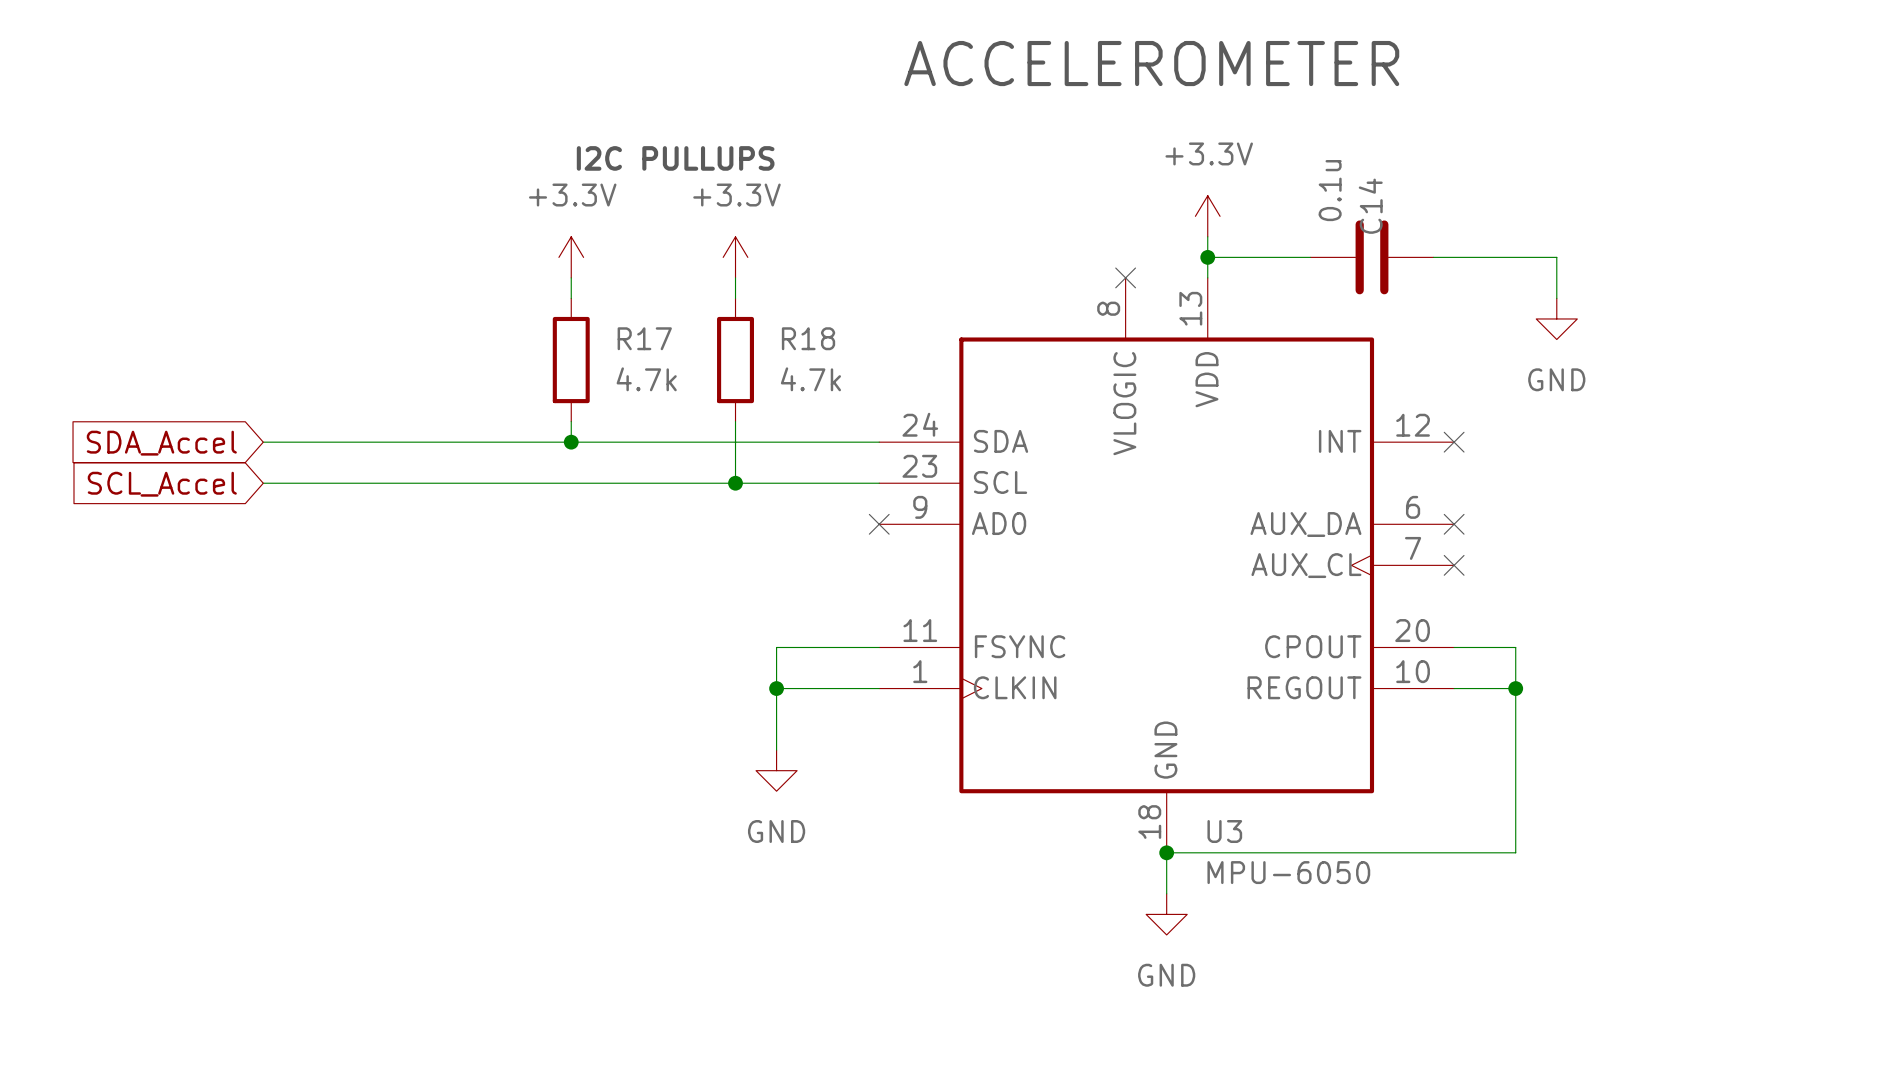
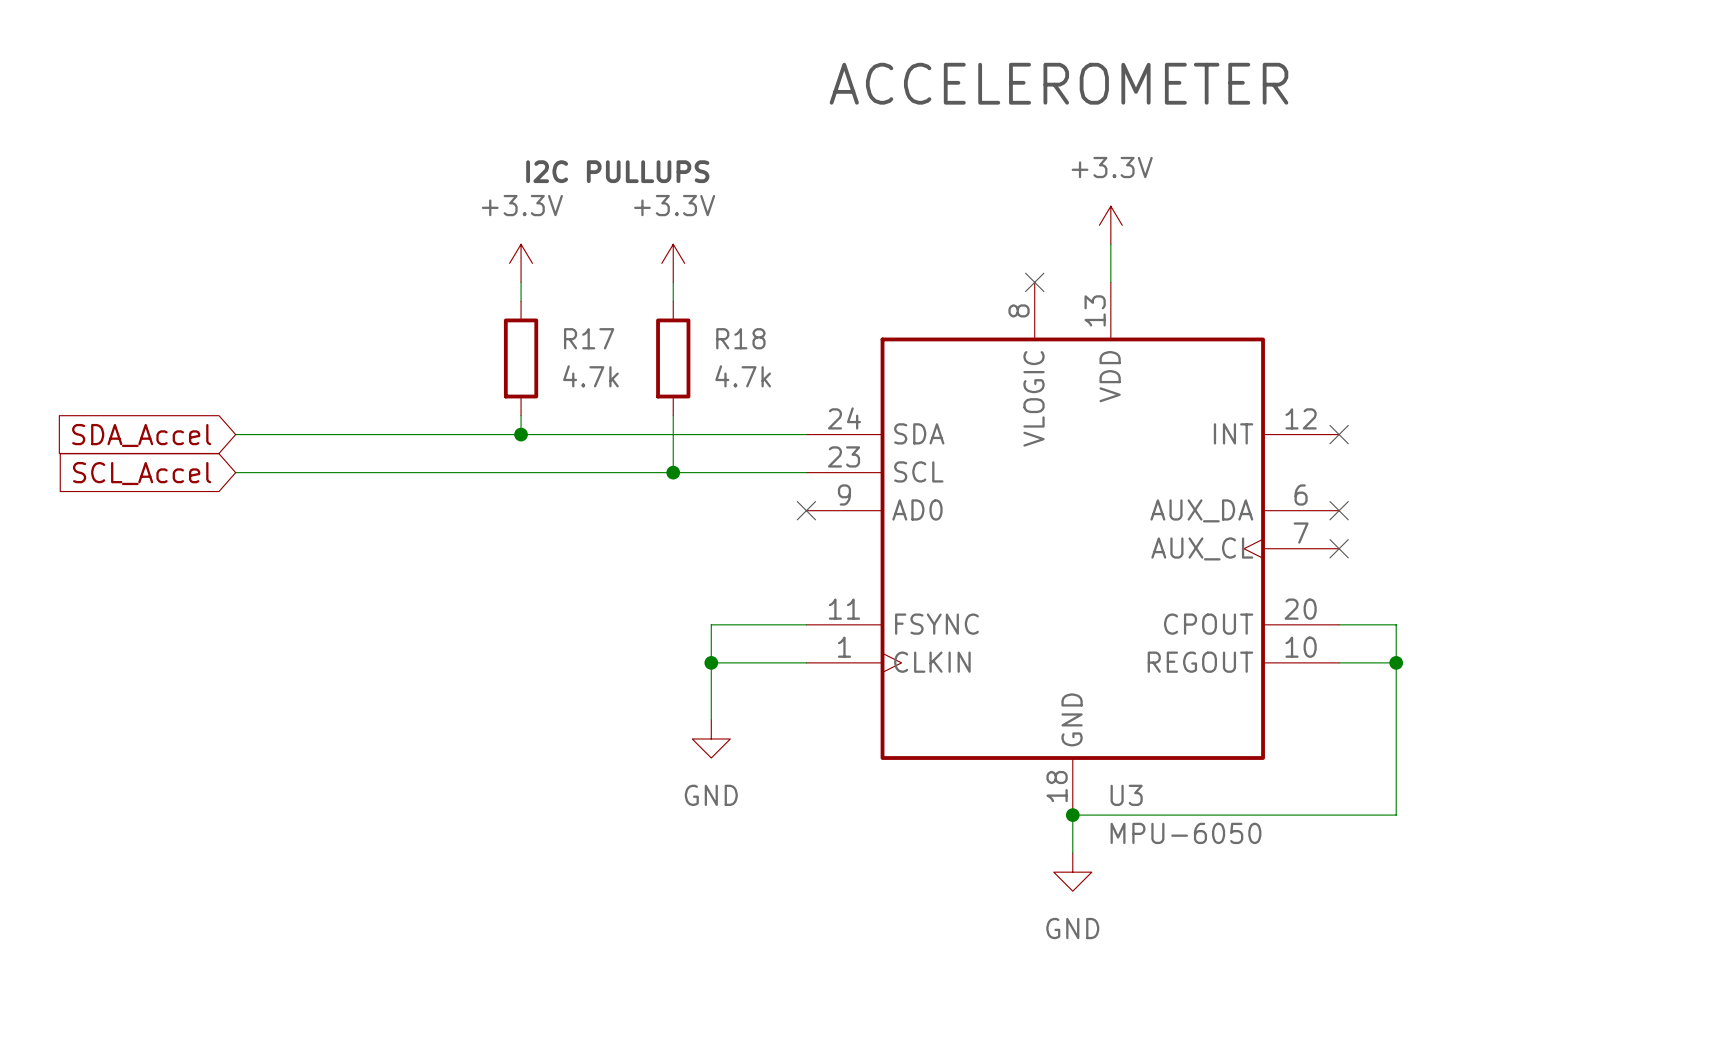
wire: (1207, 257) (1310, 257) -> none
junction: (1207, 257) -> none
C14: 0.1u (1372, 257) -> none
wire: (1433, 257) (1556, 257) (1556, 298) -> none
power symbol: GND (1556, 318) -> none

